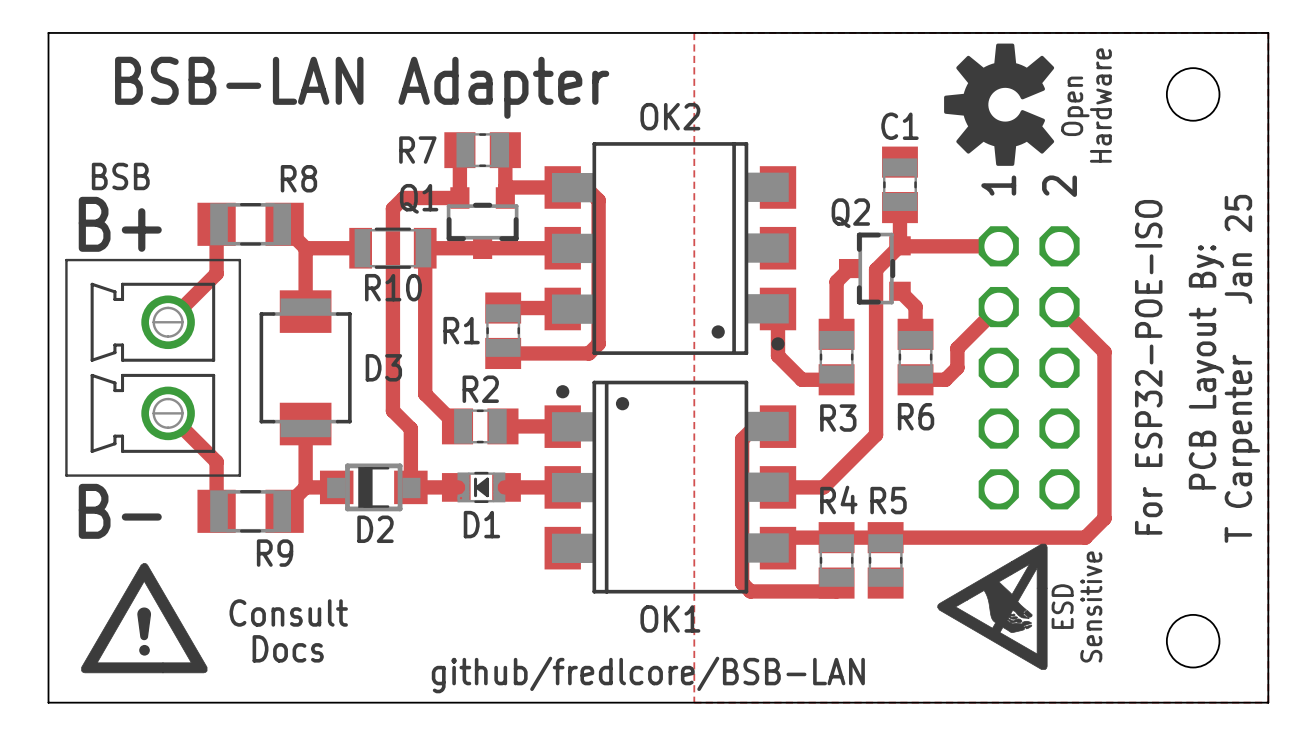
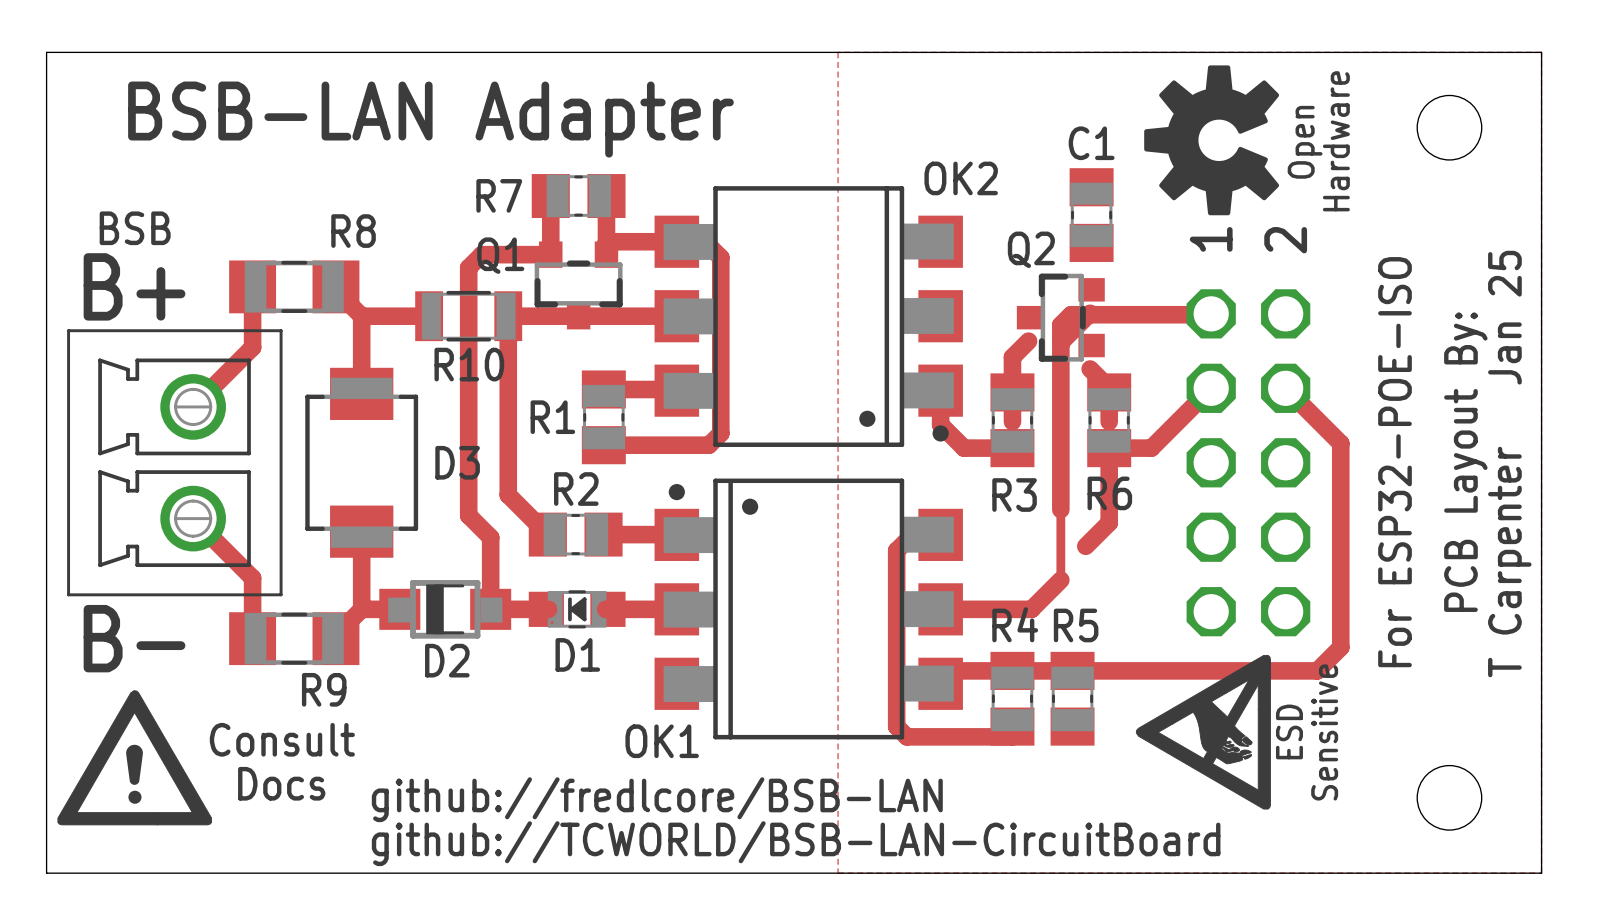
OK2 name position: OK2 (670, 116) -> OK2 (961, 178)
C1 position: (899, 184) -> (1091, 215)
top track: (899, 207) (899, 246) (998, 246) -> (1060, 342) (1060, 325) (1071, 314) (1211, 313)
Q2 position: (874, 268) -> (1060, 317)
top track: (778, 336) (778, 355) (801, 379) (836, 379) -> (940, 424) (964, 448) (1012, 448)
top track: (957, 348) (957, 367) (945, 379) (915, 379) -> (1160, 439) (1151, 448) (1109, 448) (1109, 522) (1085, 546)
R3 position: (836, 357) -> (1012, 420)
R6 position: (915, 357) -> (1109, 420)
top track width: thick (876, 406) (876, 434) -> thin (1060, 509) (1060, 544)
top track: (876, 434) (823, 487) -> (1060, 544) (1060, 580) (1031, 609) (996, 609)
drawing position: (992, 606) -> (1203, 732)
text position: Consult (288, 612) -> Consult (282, 739)
drawing position: (144, 618) -> (134, 757)
OK1 name position: OK1 (670, 618) -> OK1 (662, 741)
text position: Docs (288, 648) -> Docs (281, 783)
text: github/fredlcore/BSB-LAN (648, 674) -> github://fredlcore/BSB-LAN (657, 799)
text: none -> github://TCWORLD/BSB-LAN-CircuitBoard (796, 843)

